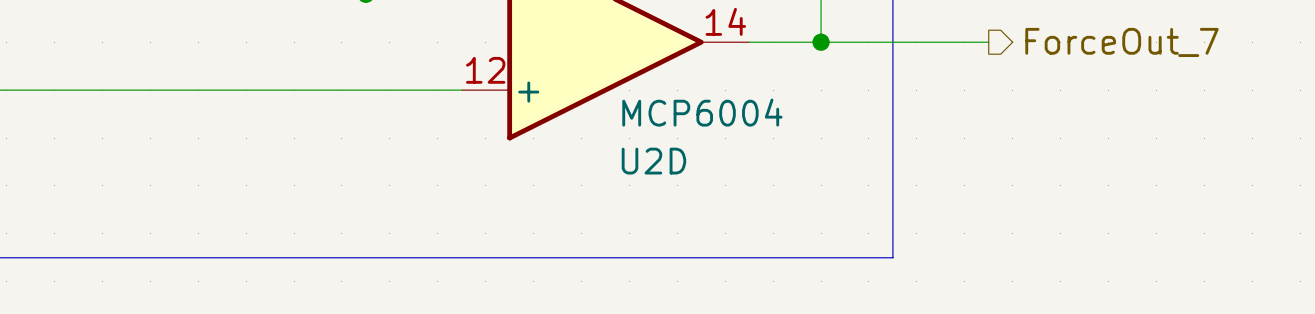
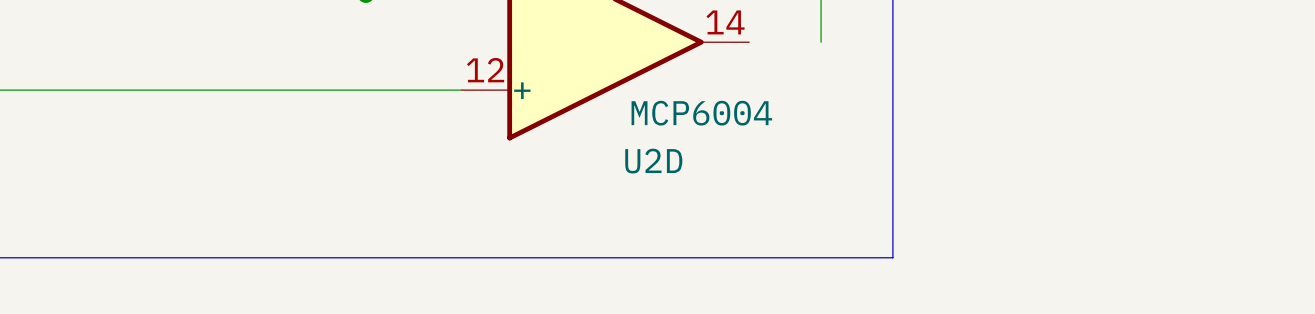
wire: (749, 42) (988, 42) -> none
junction: (821, 42) -> none
hierarchical label: ForceOut_7 (1121, 42) -> none

